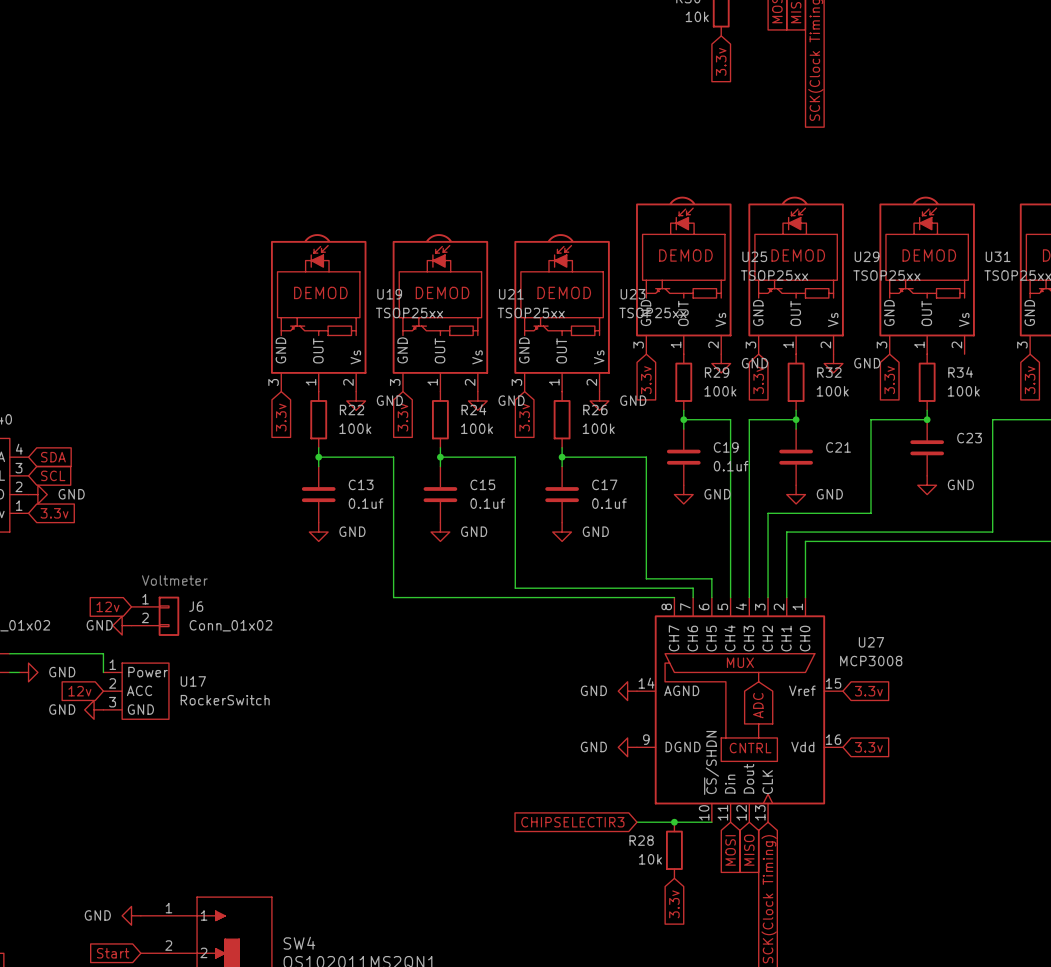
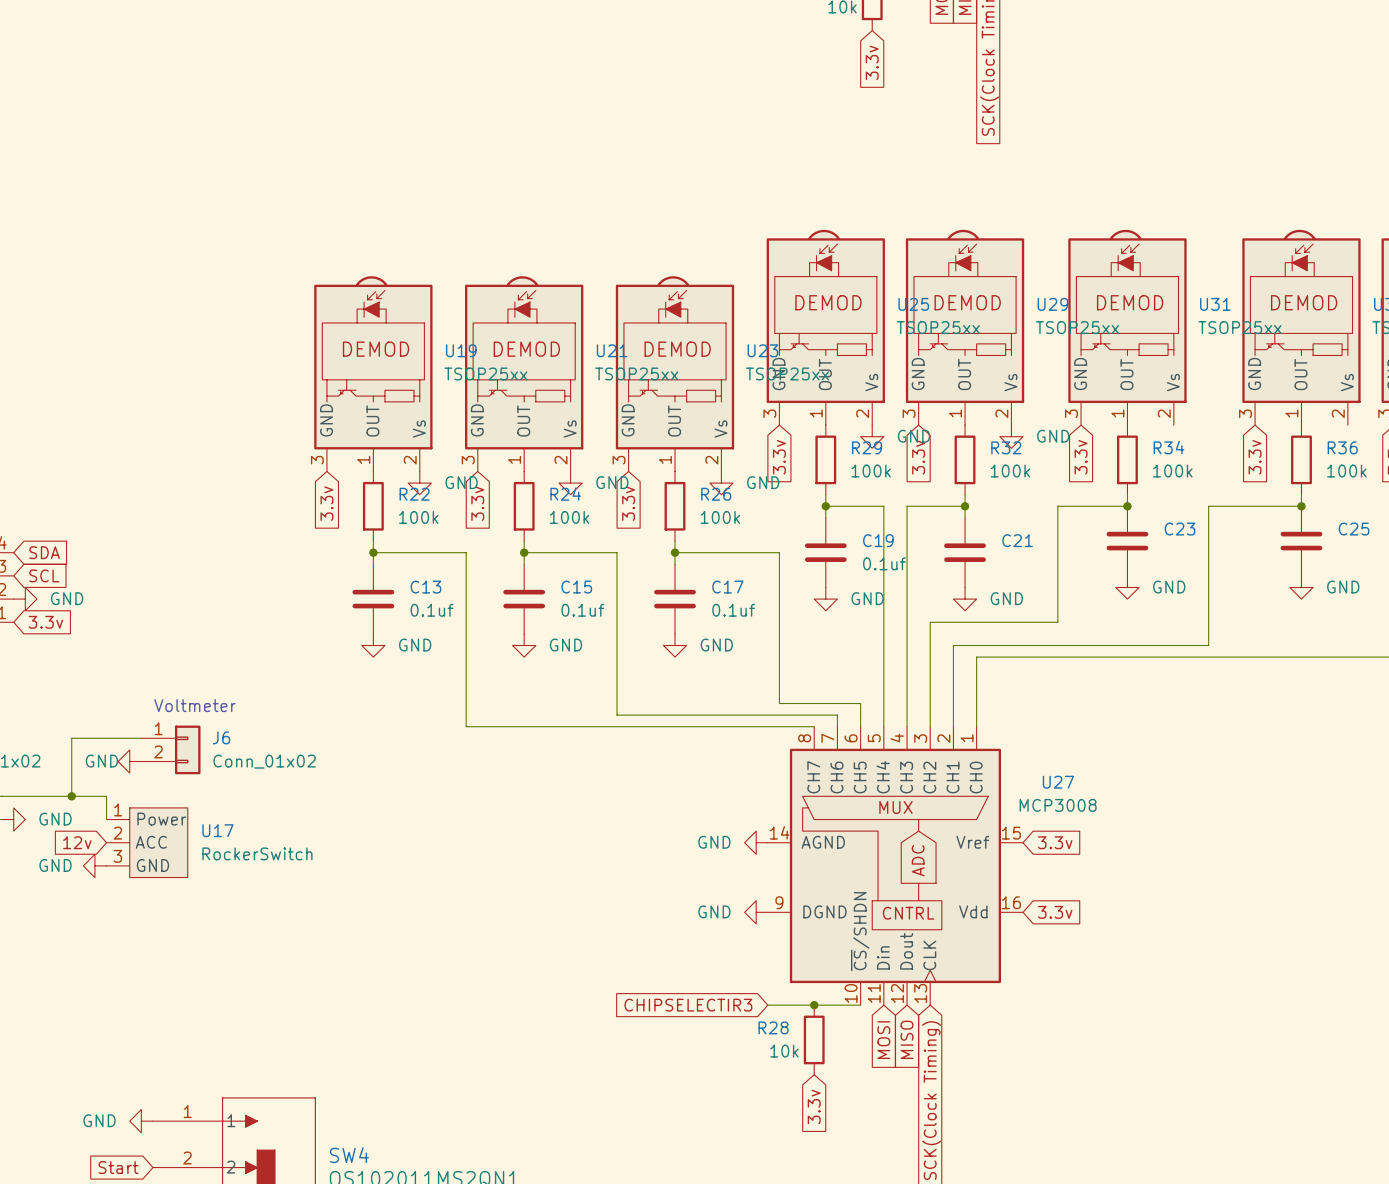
global label: 12v (107, 606) -> none
wire: none -> (141, 738) (71, 738) (71, 796)
junction: none -> (71, 796)

